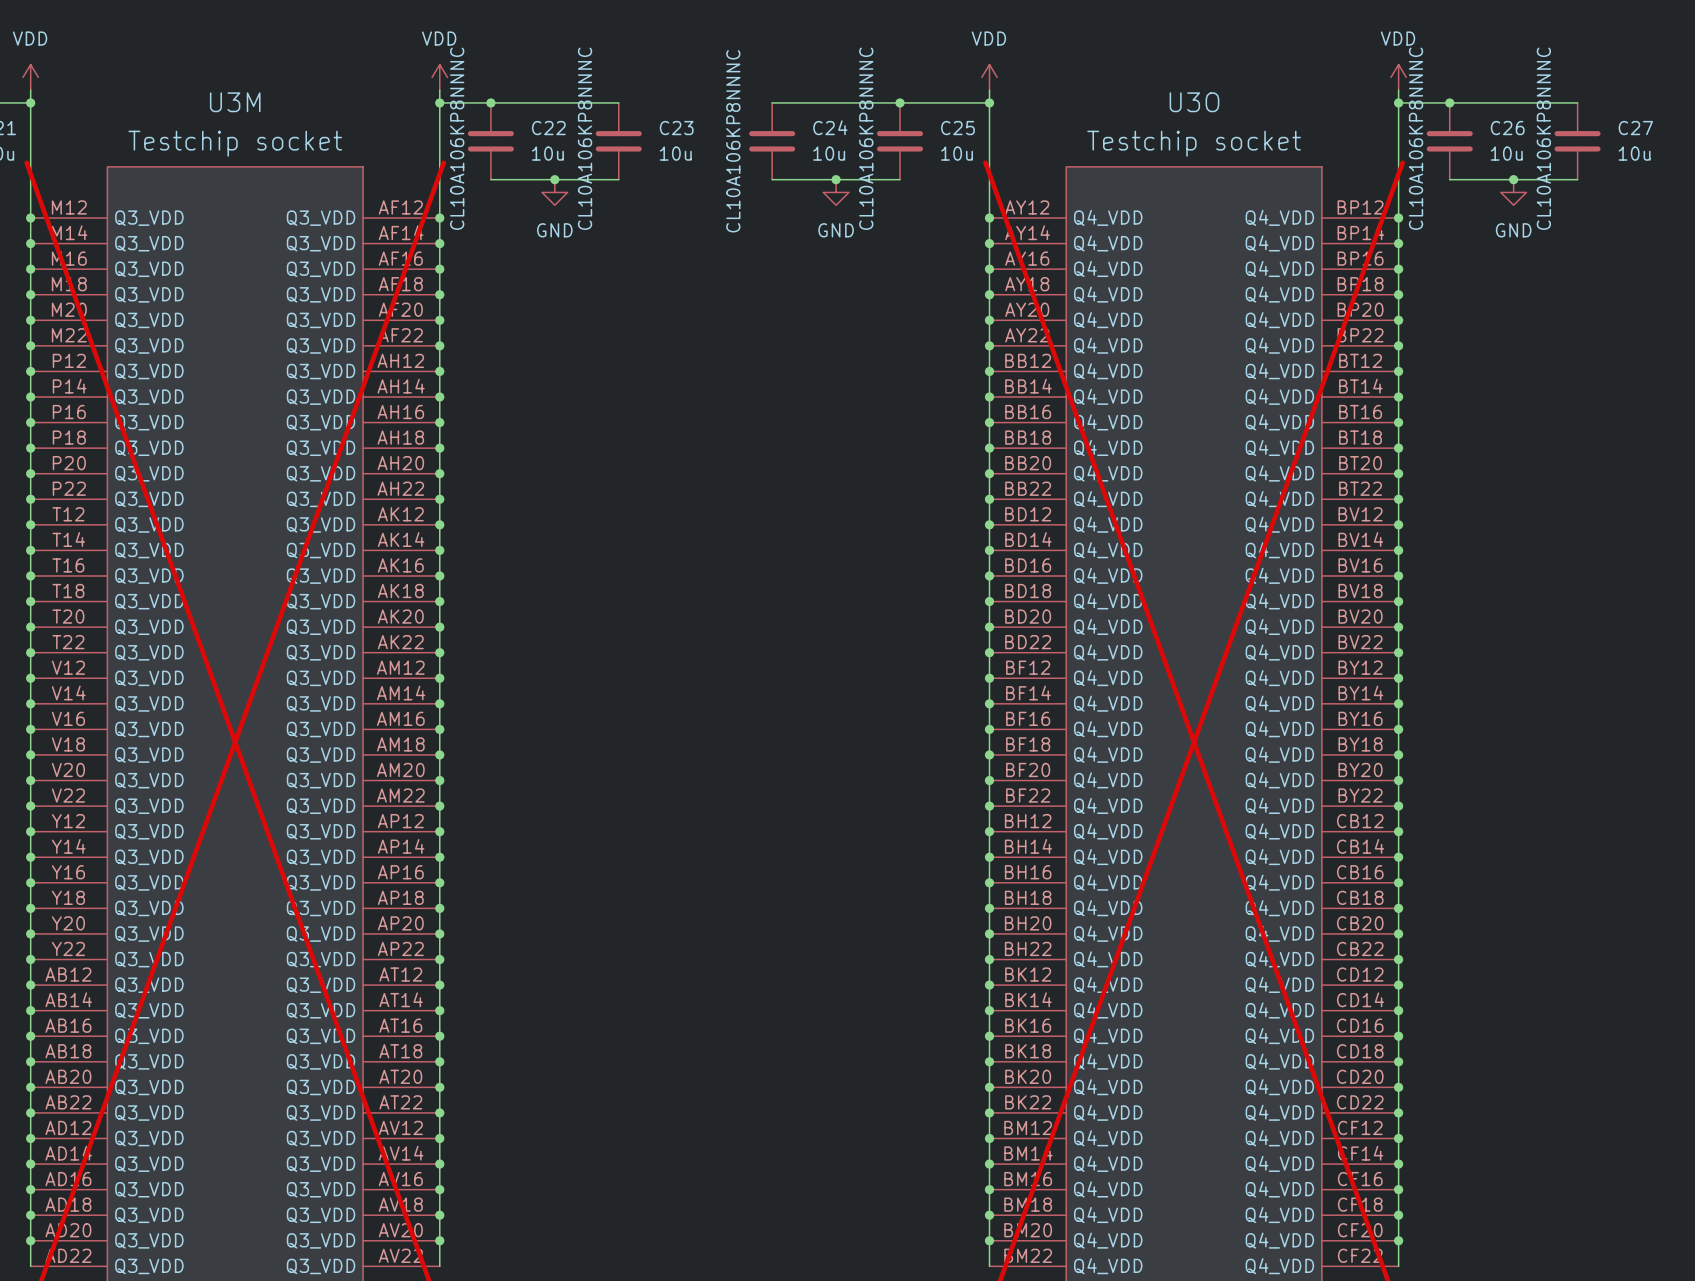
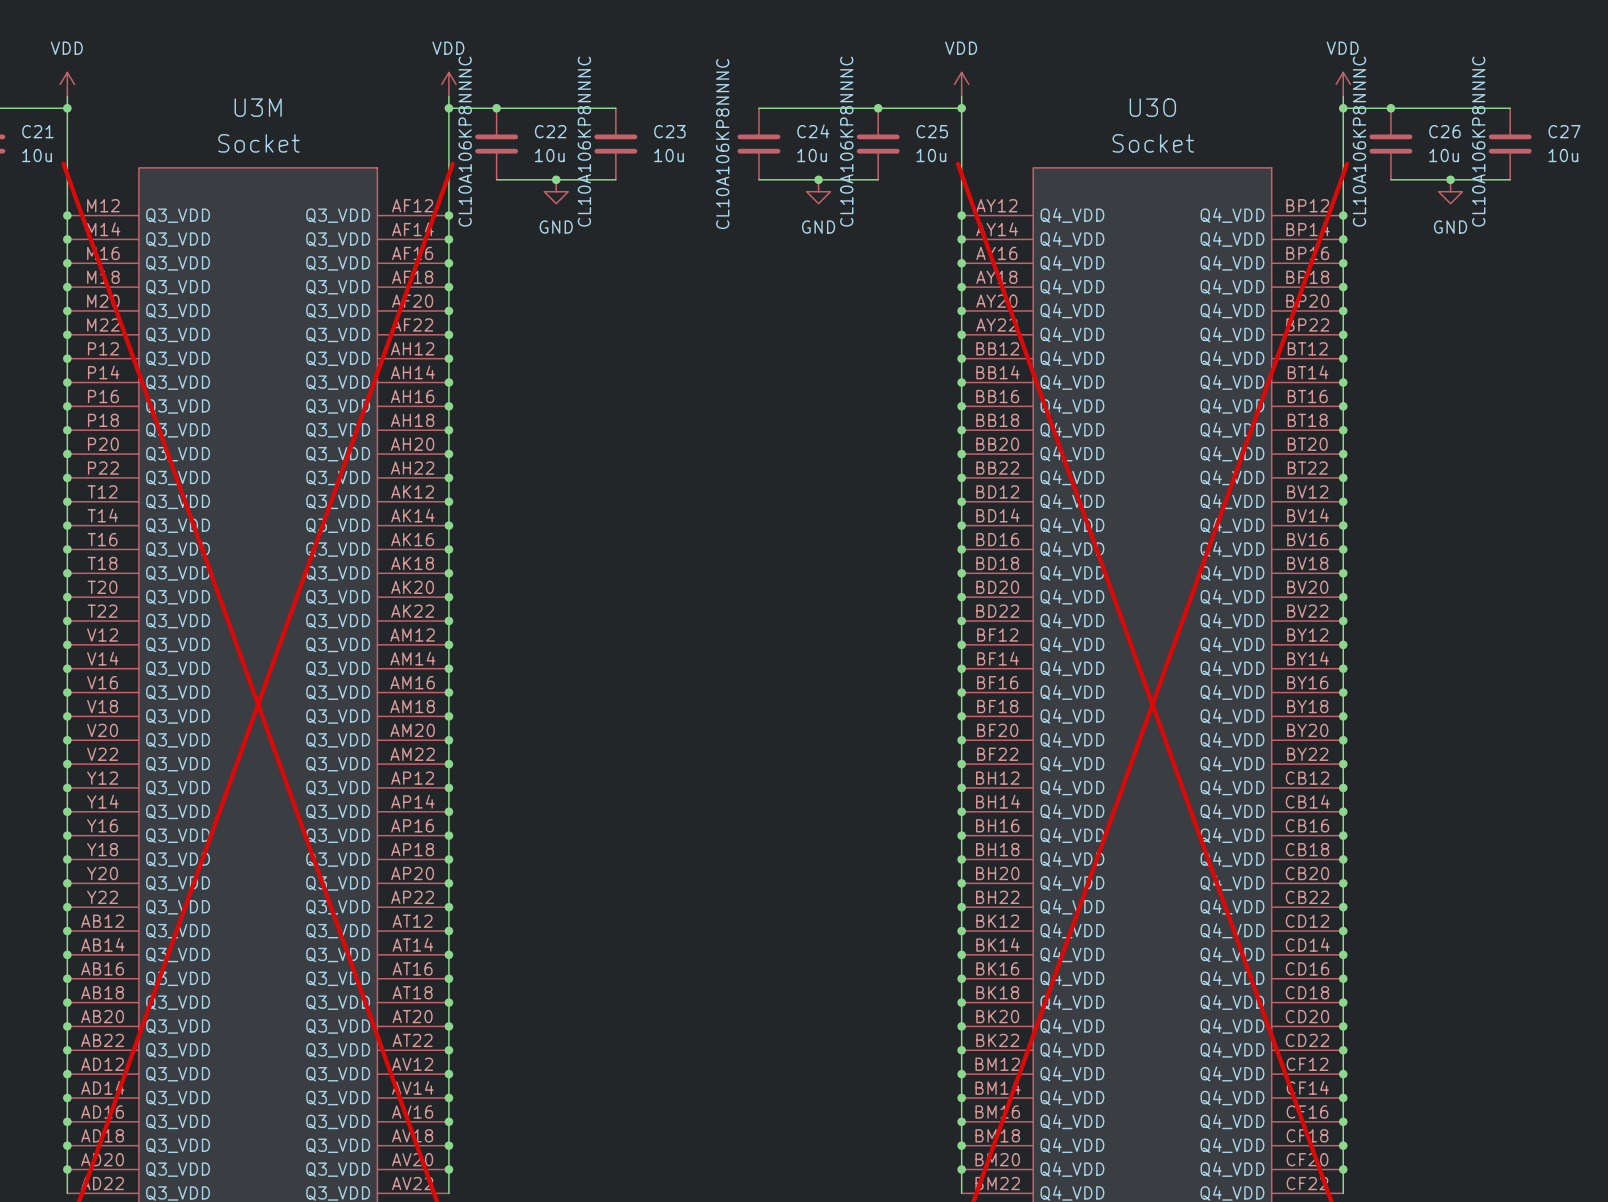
U3M value: Testchip socket (235, 143) -> Socket (258, 143)
U3O value: Testchip socket (1194, 143) -> Socket (1153, 143)

